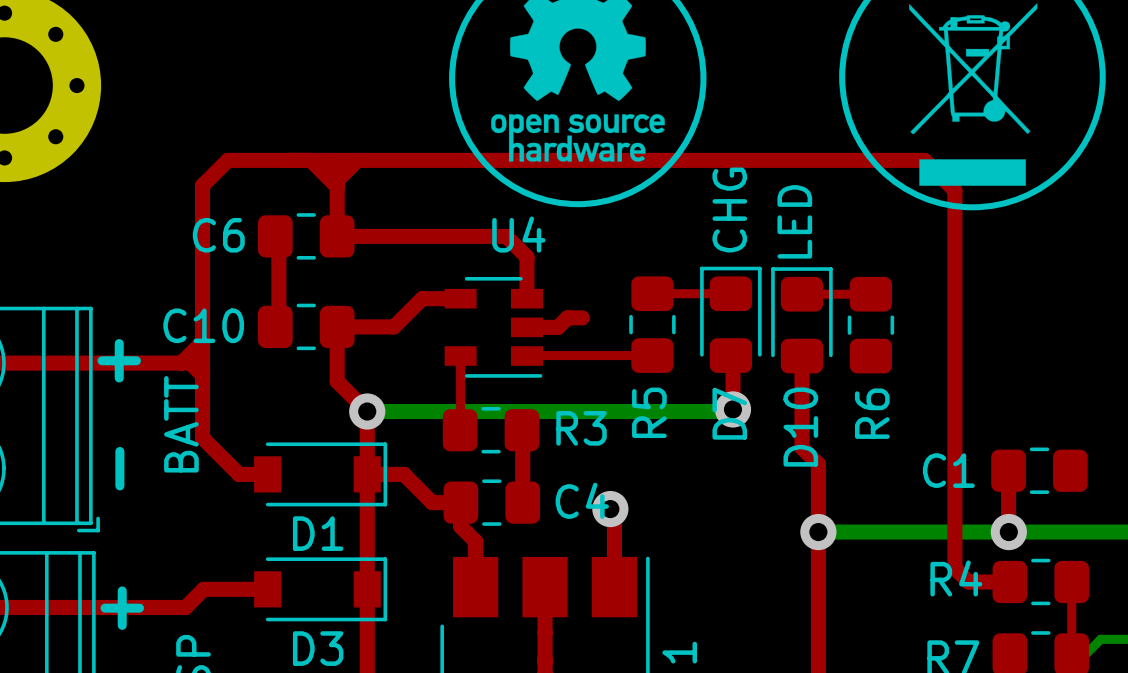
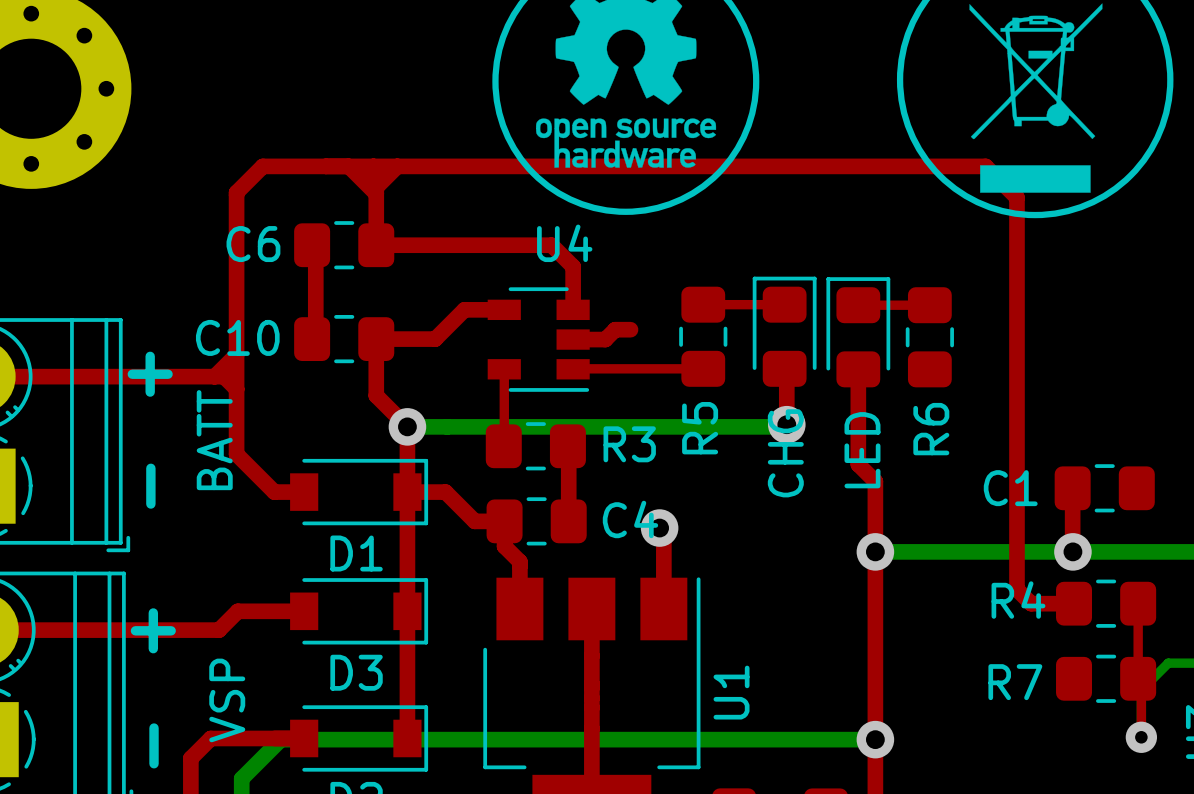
D7 value position: CHG (729, 210) -> CHG (785, 453)
D10 value position: LED (794, 221) -> LED (862, 450)
D7 name: D7 (729, 413) -> none
D10 name: D10 (800, 427) -> none

